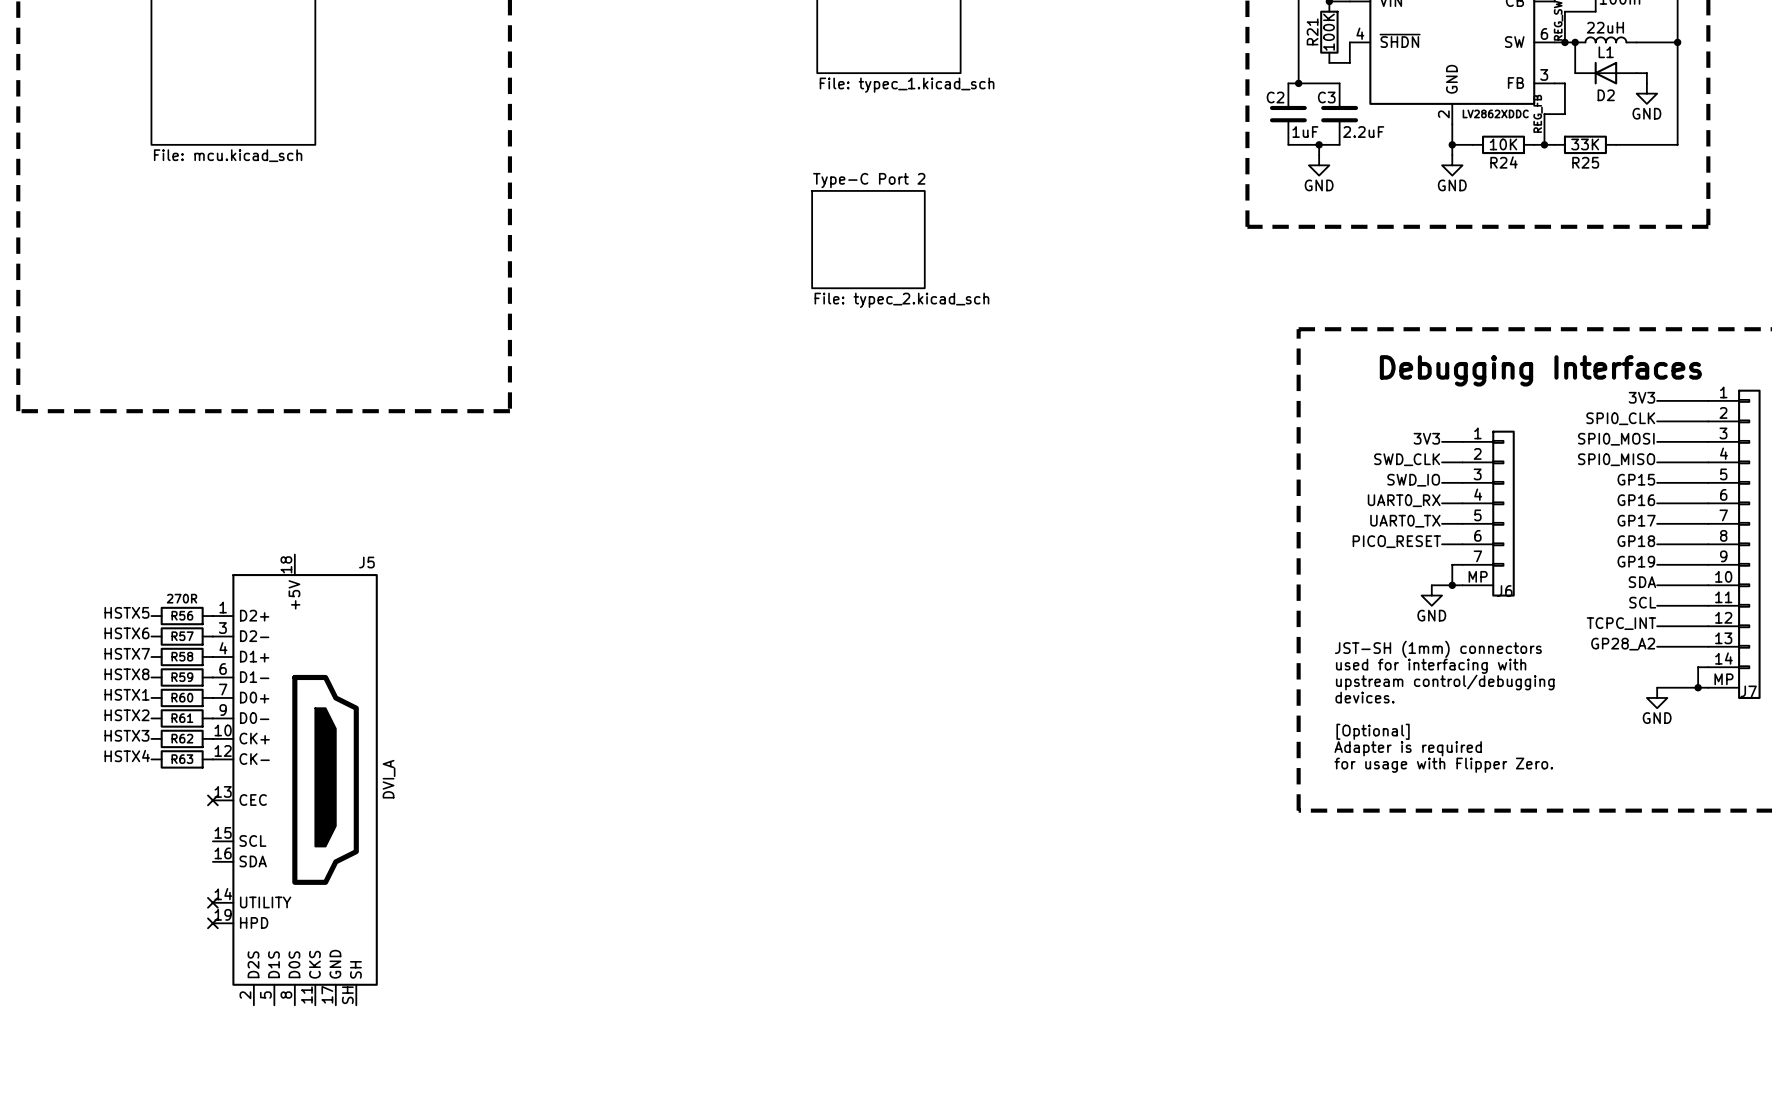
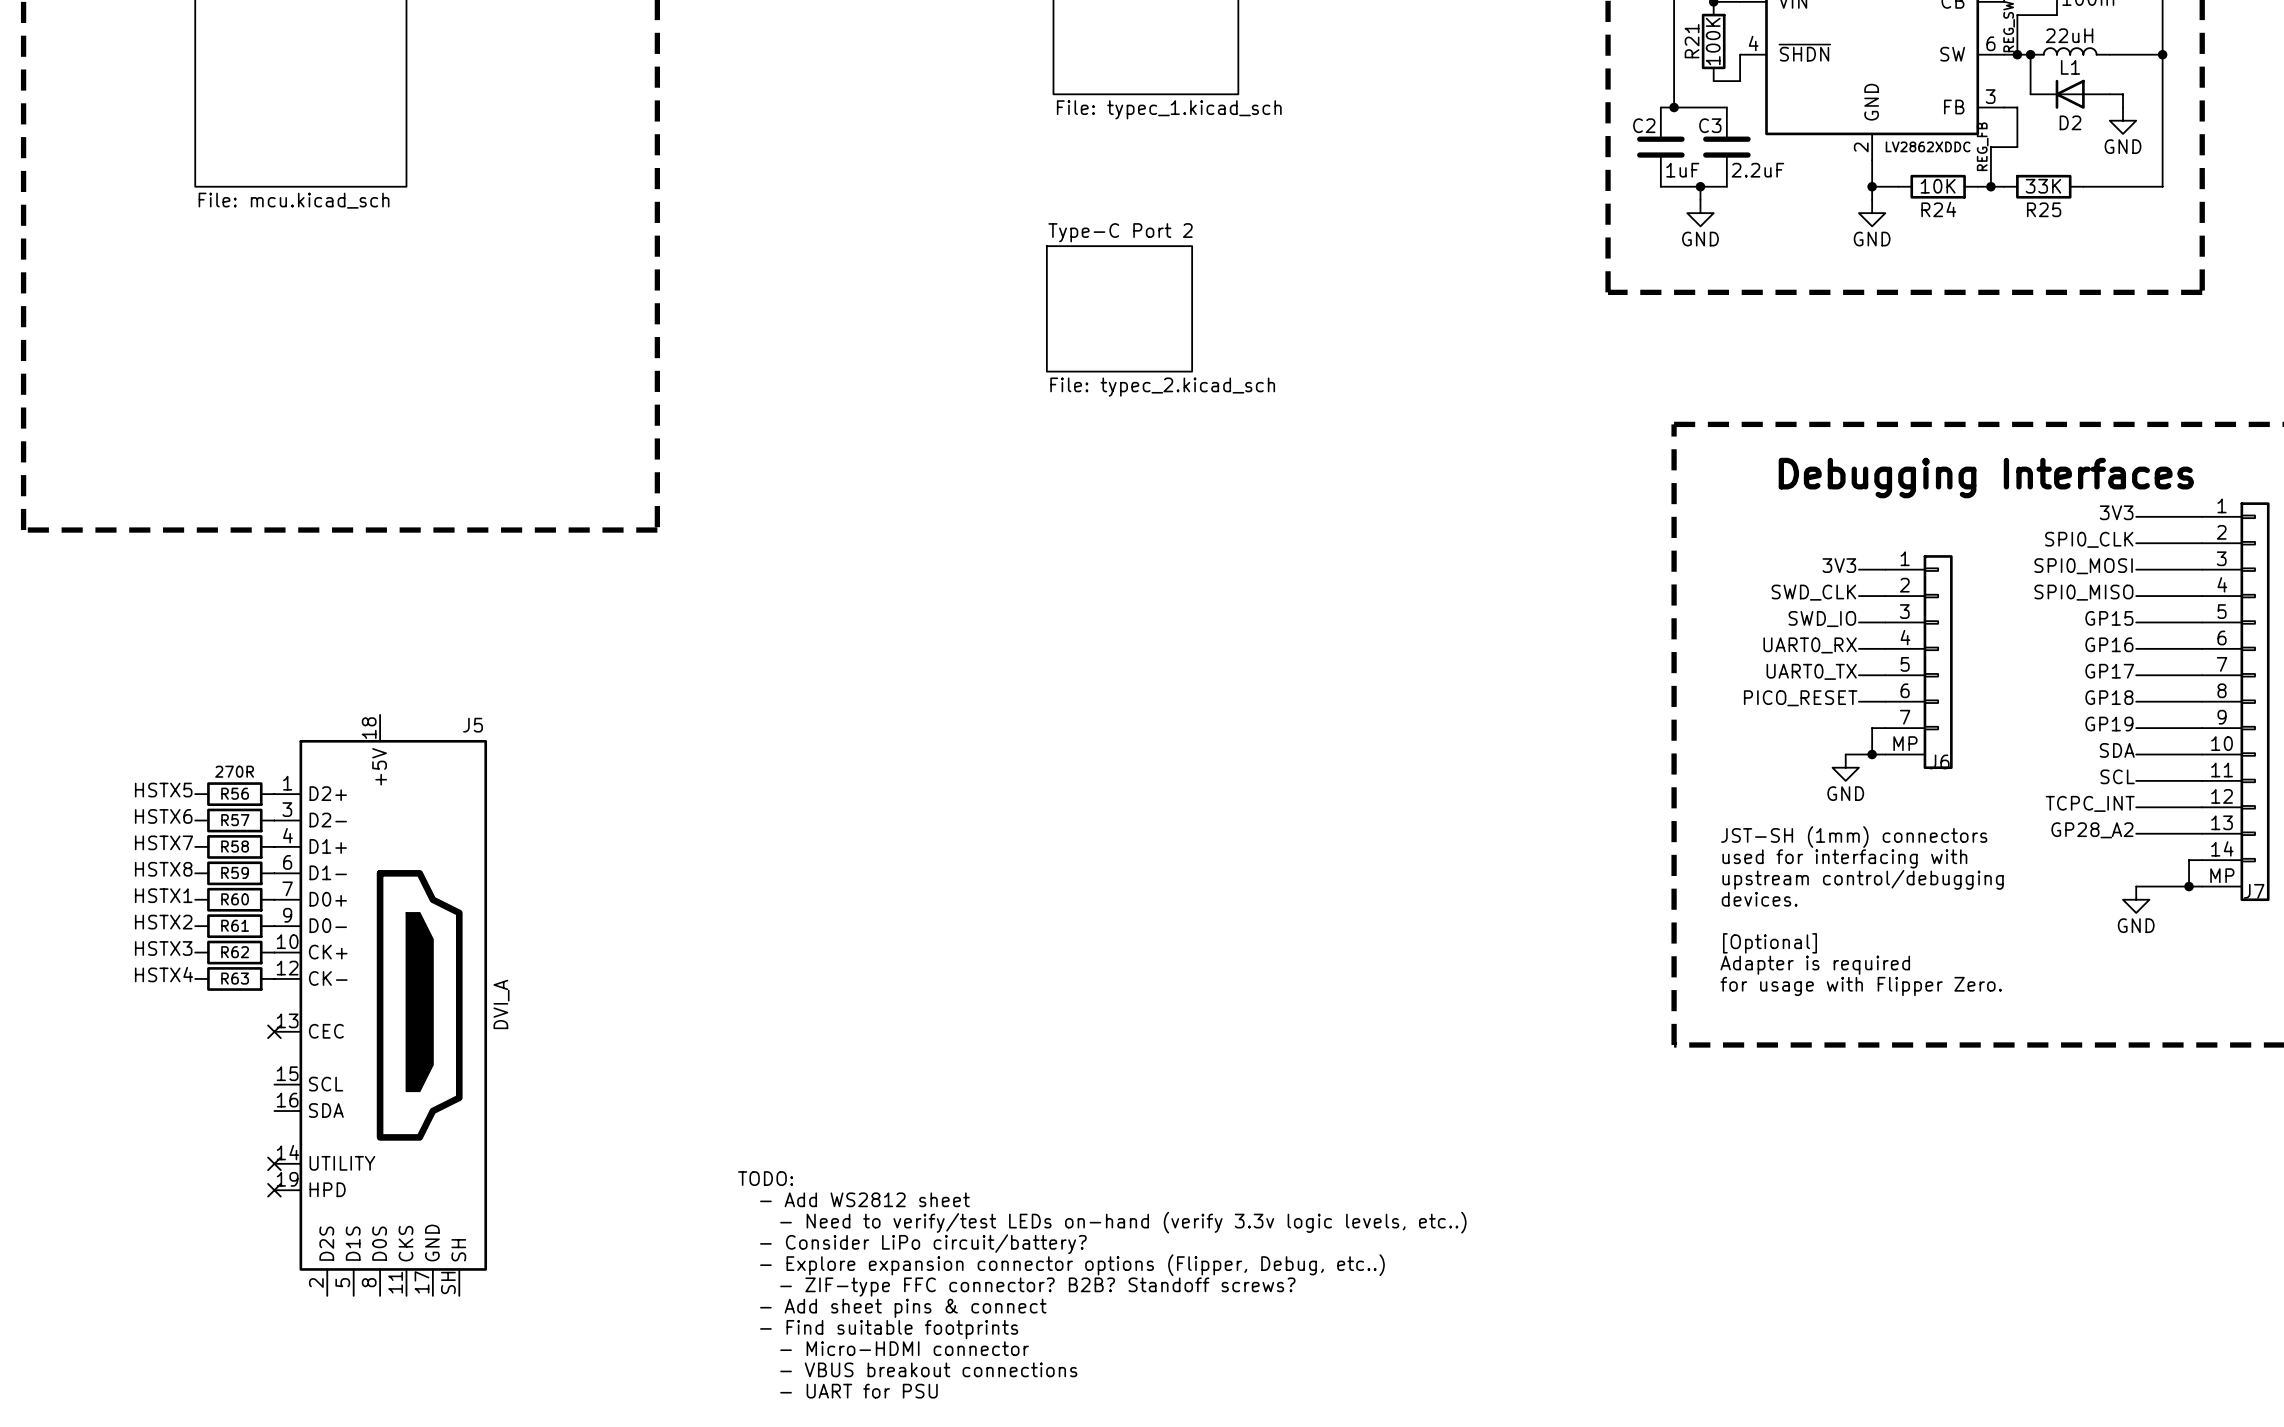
text: none -> TODO: (765, 1178)
text: none -> - Add WS2812 sheet (864, 1199)
text: none -> - Need to verify/test LEDs on-hand (verify 3.3v logic levels, etc..) (1123, 1222)
text: none -> - Consider LiPo circuit/battery? (923, 1244)
text: none -> - Explore expansion connector options (Flipper, Debug, etc..) (1072, 1265)
text: none -> - ZIF-type FFC connector? B2B? Standoff screws? (1037, 1287)
text: none -> - Add sheet pins & connect (903, 1308)
text: none -> - Find suitable footprints (889, 1329)
text: none -> - Micro-HDMI connector (904, 1348)
text: none -> - VBUS breakout connections (928, 1369)
text: none -> - UART for PSU (858, 1391)

